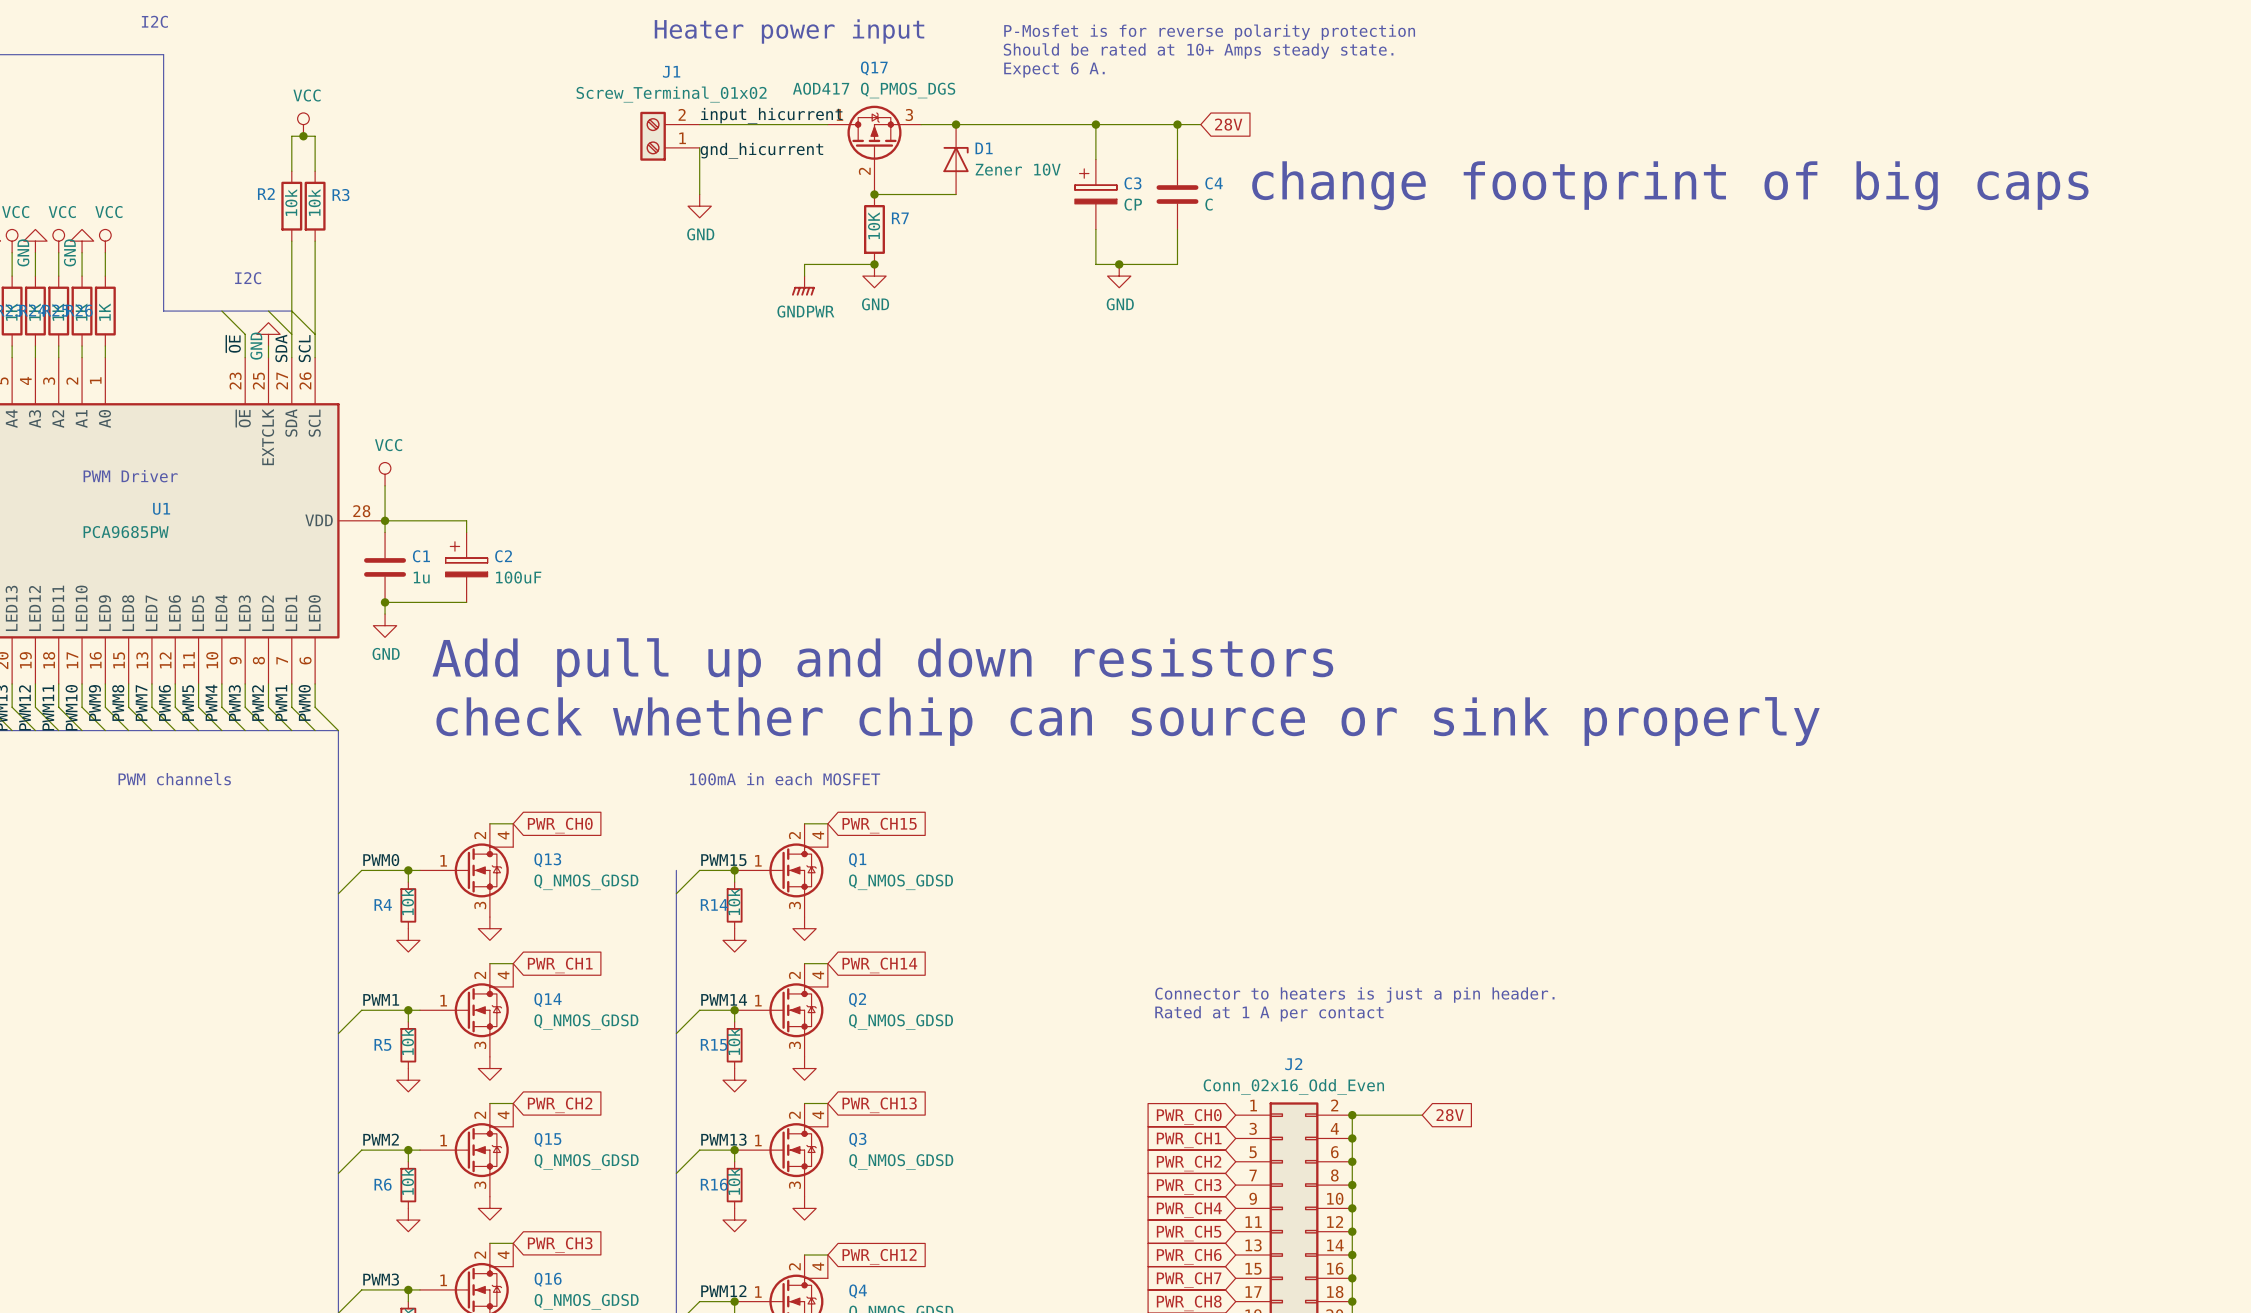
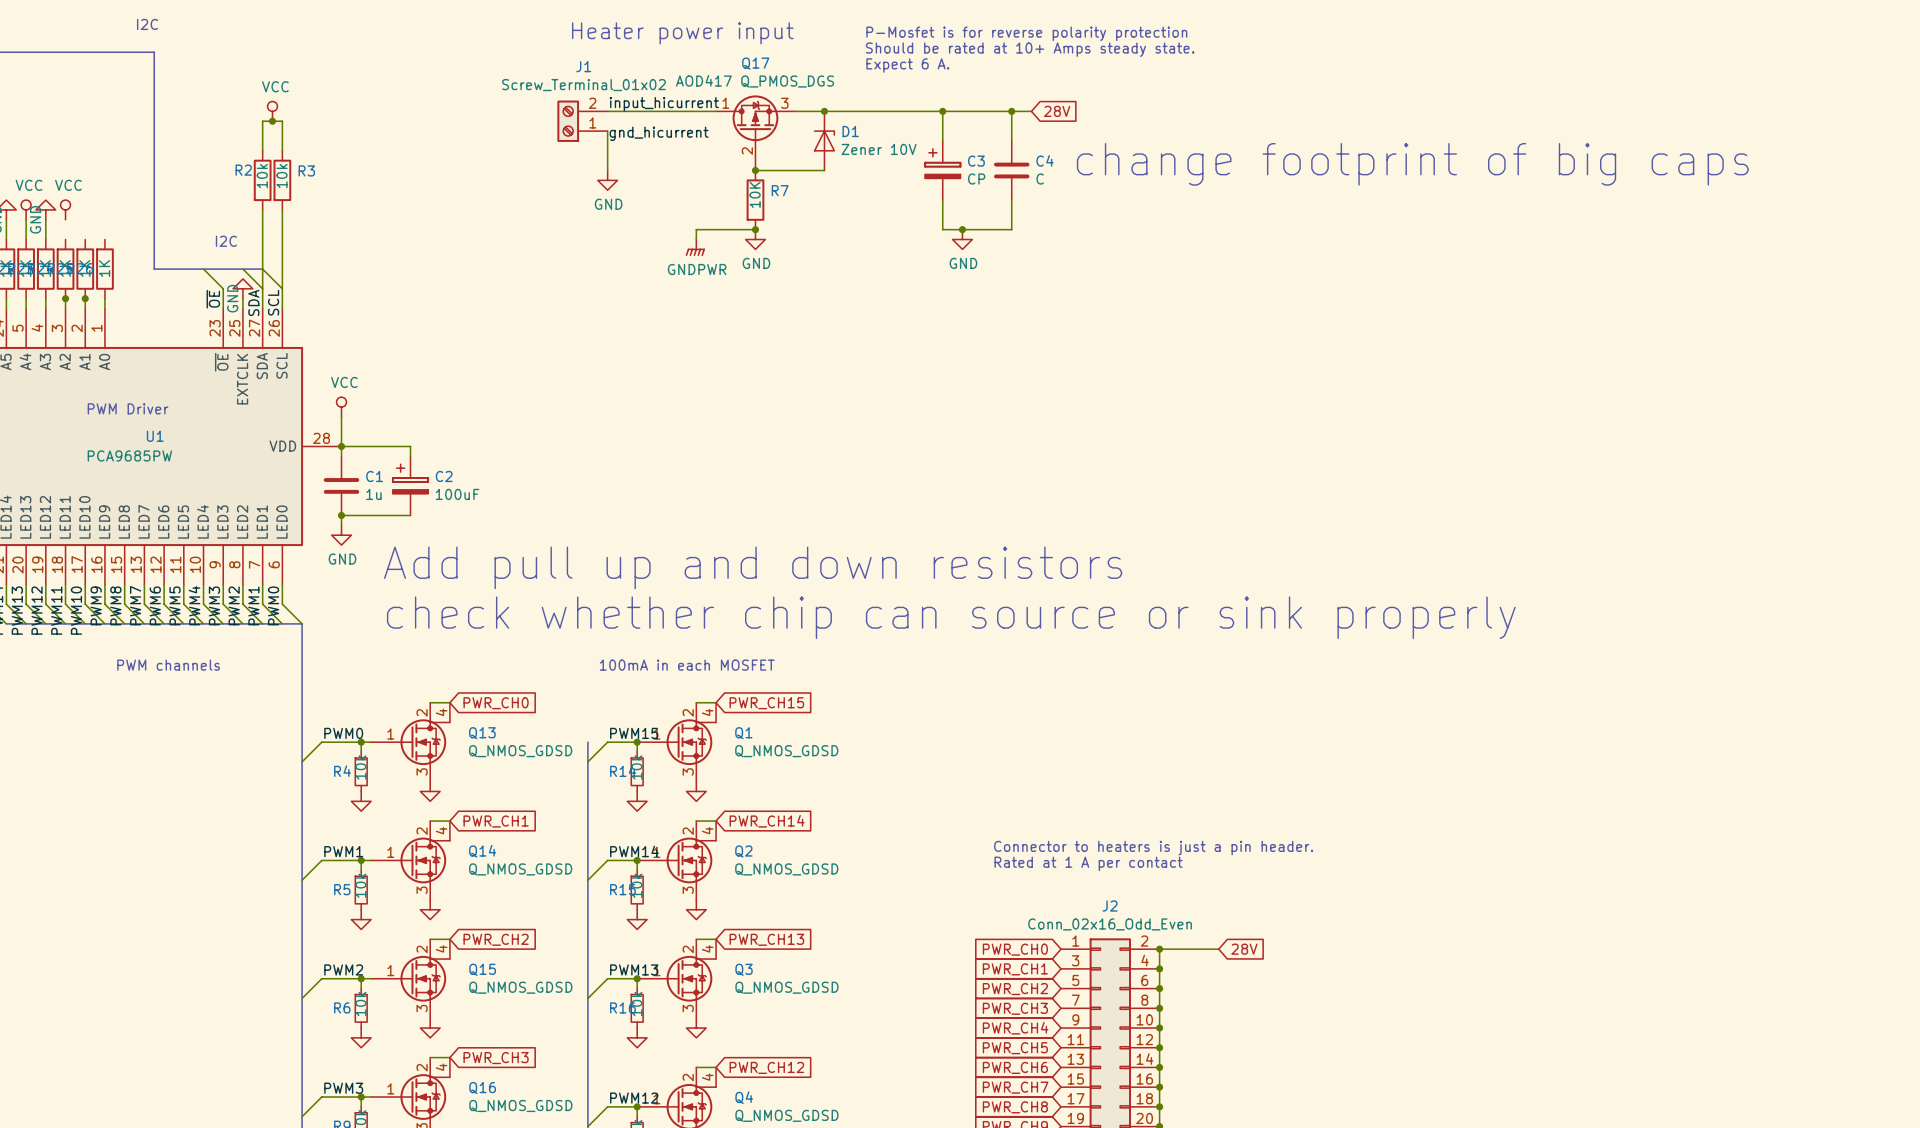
power symbol: GND (82, 241) -> none
power symbol: VCC (105, 241) -> none
wire: (58, 252) (58, 276) -> none
wire: (82, 252) (82, 276) -> none
wire: (105, 252) (105, 276) -> none
junction: none -> (65, 298)
junction: none -> (85, 298)

